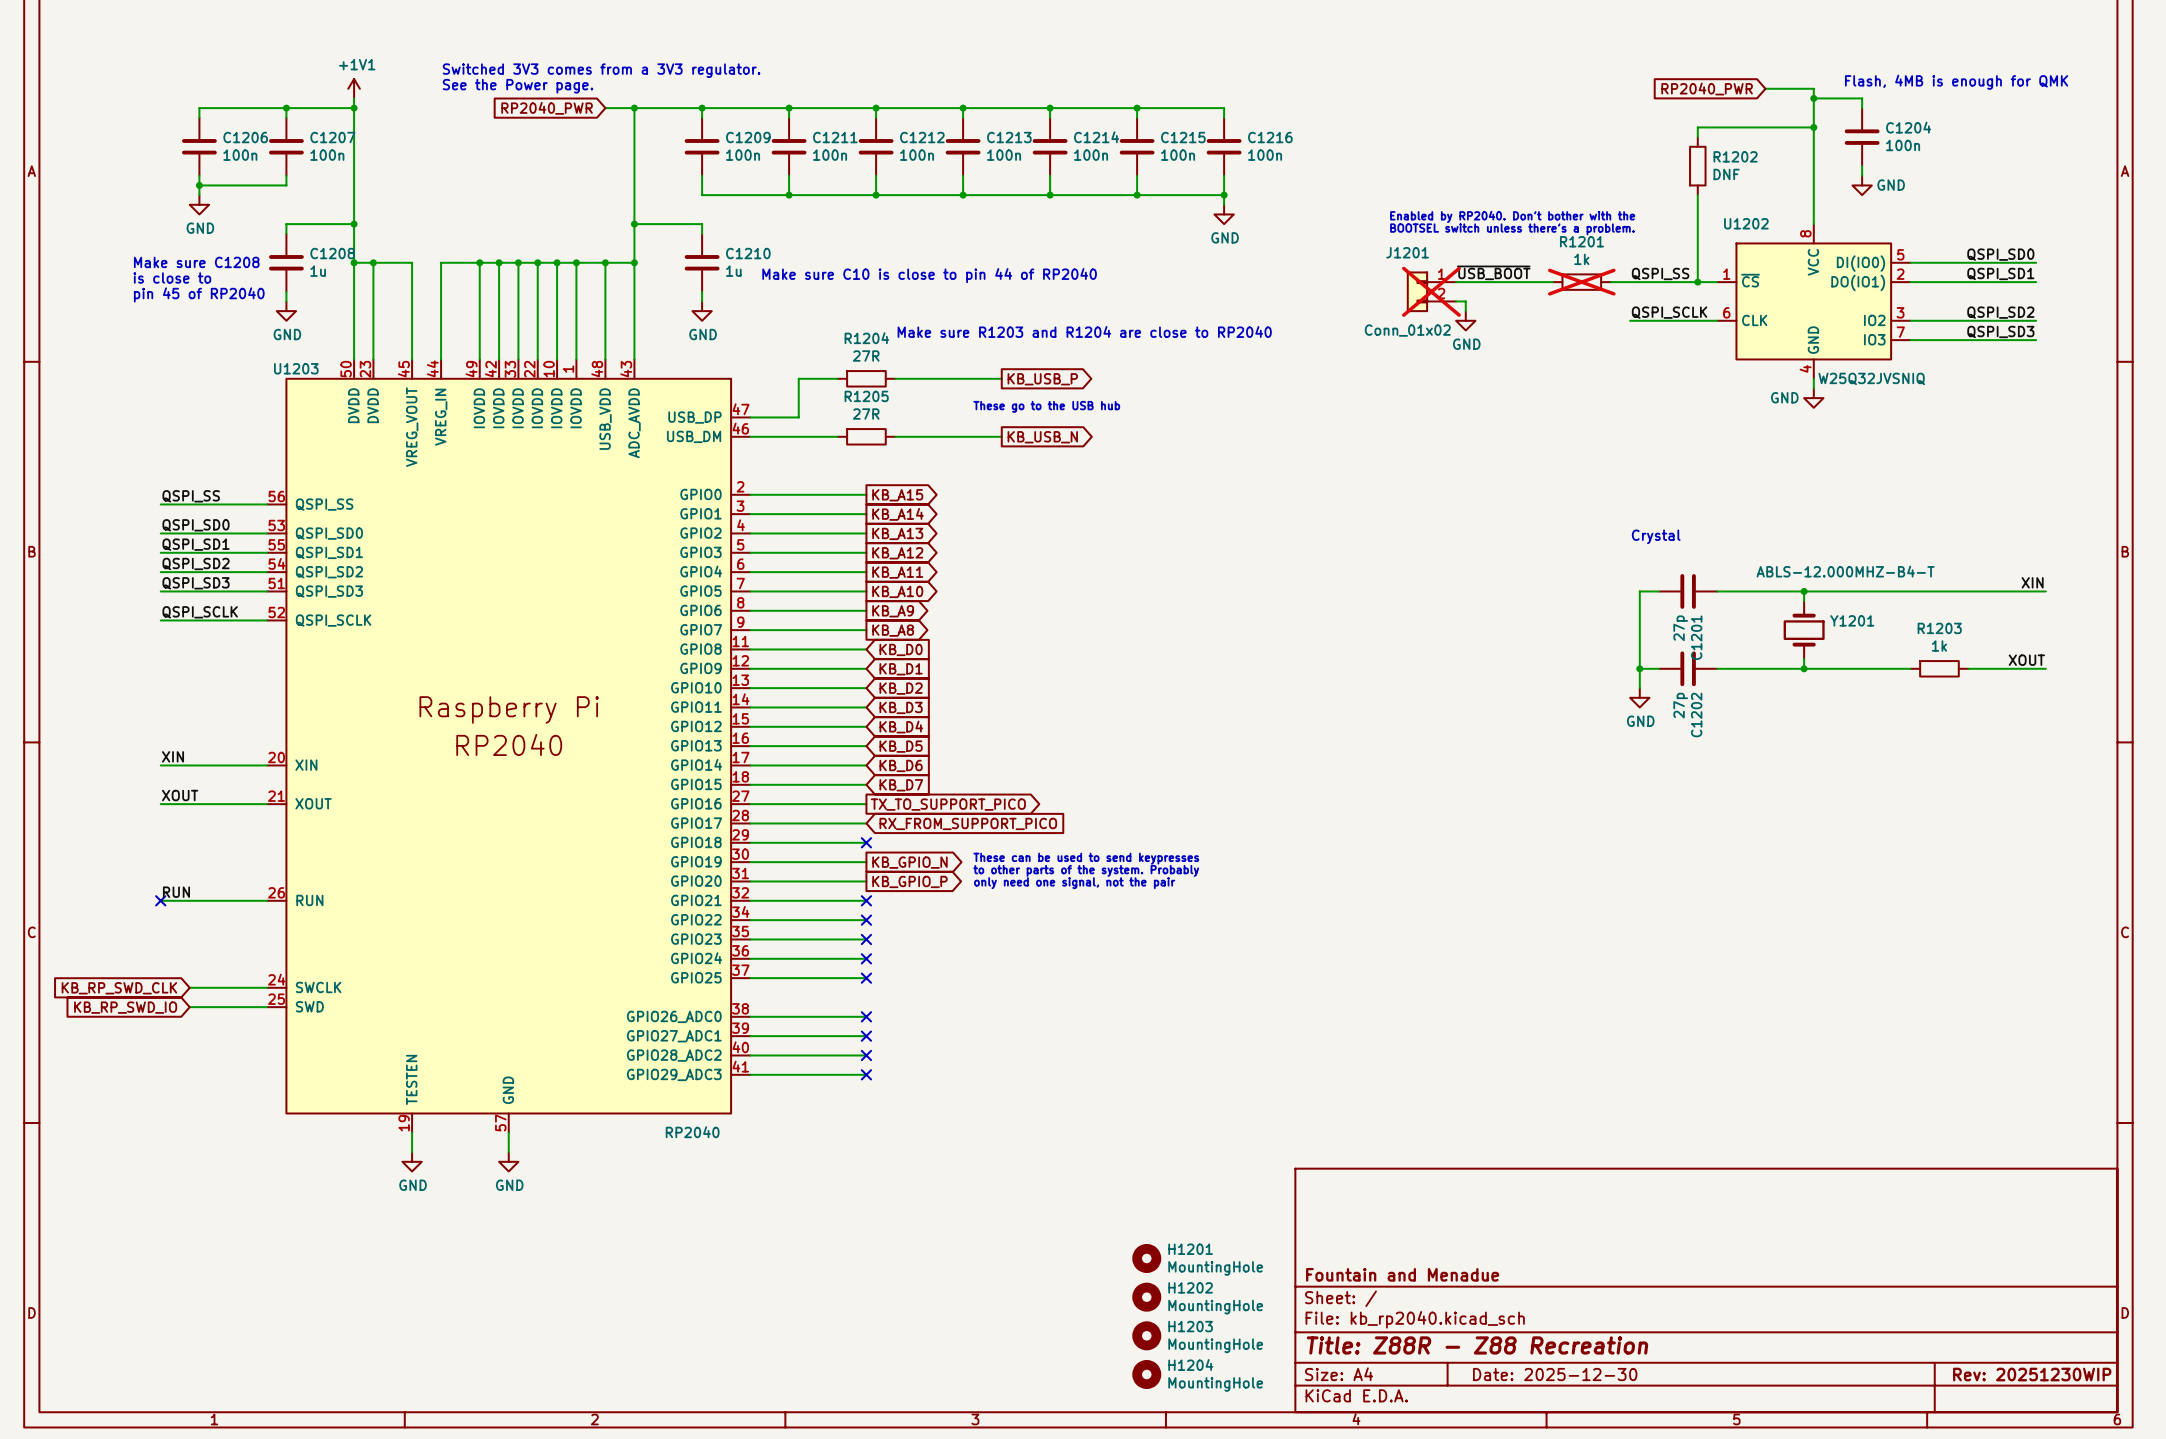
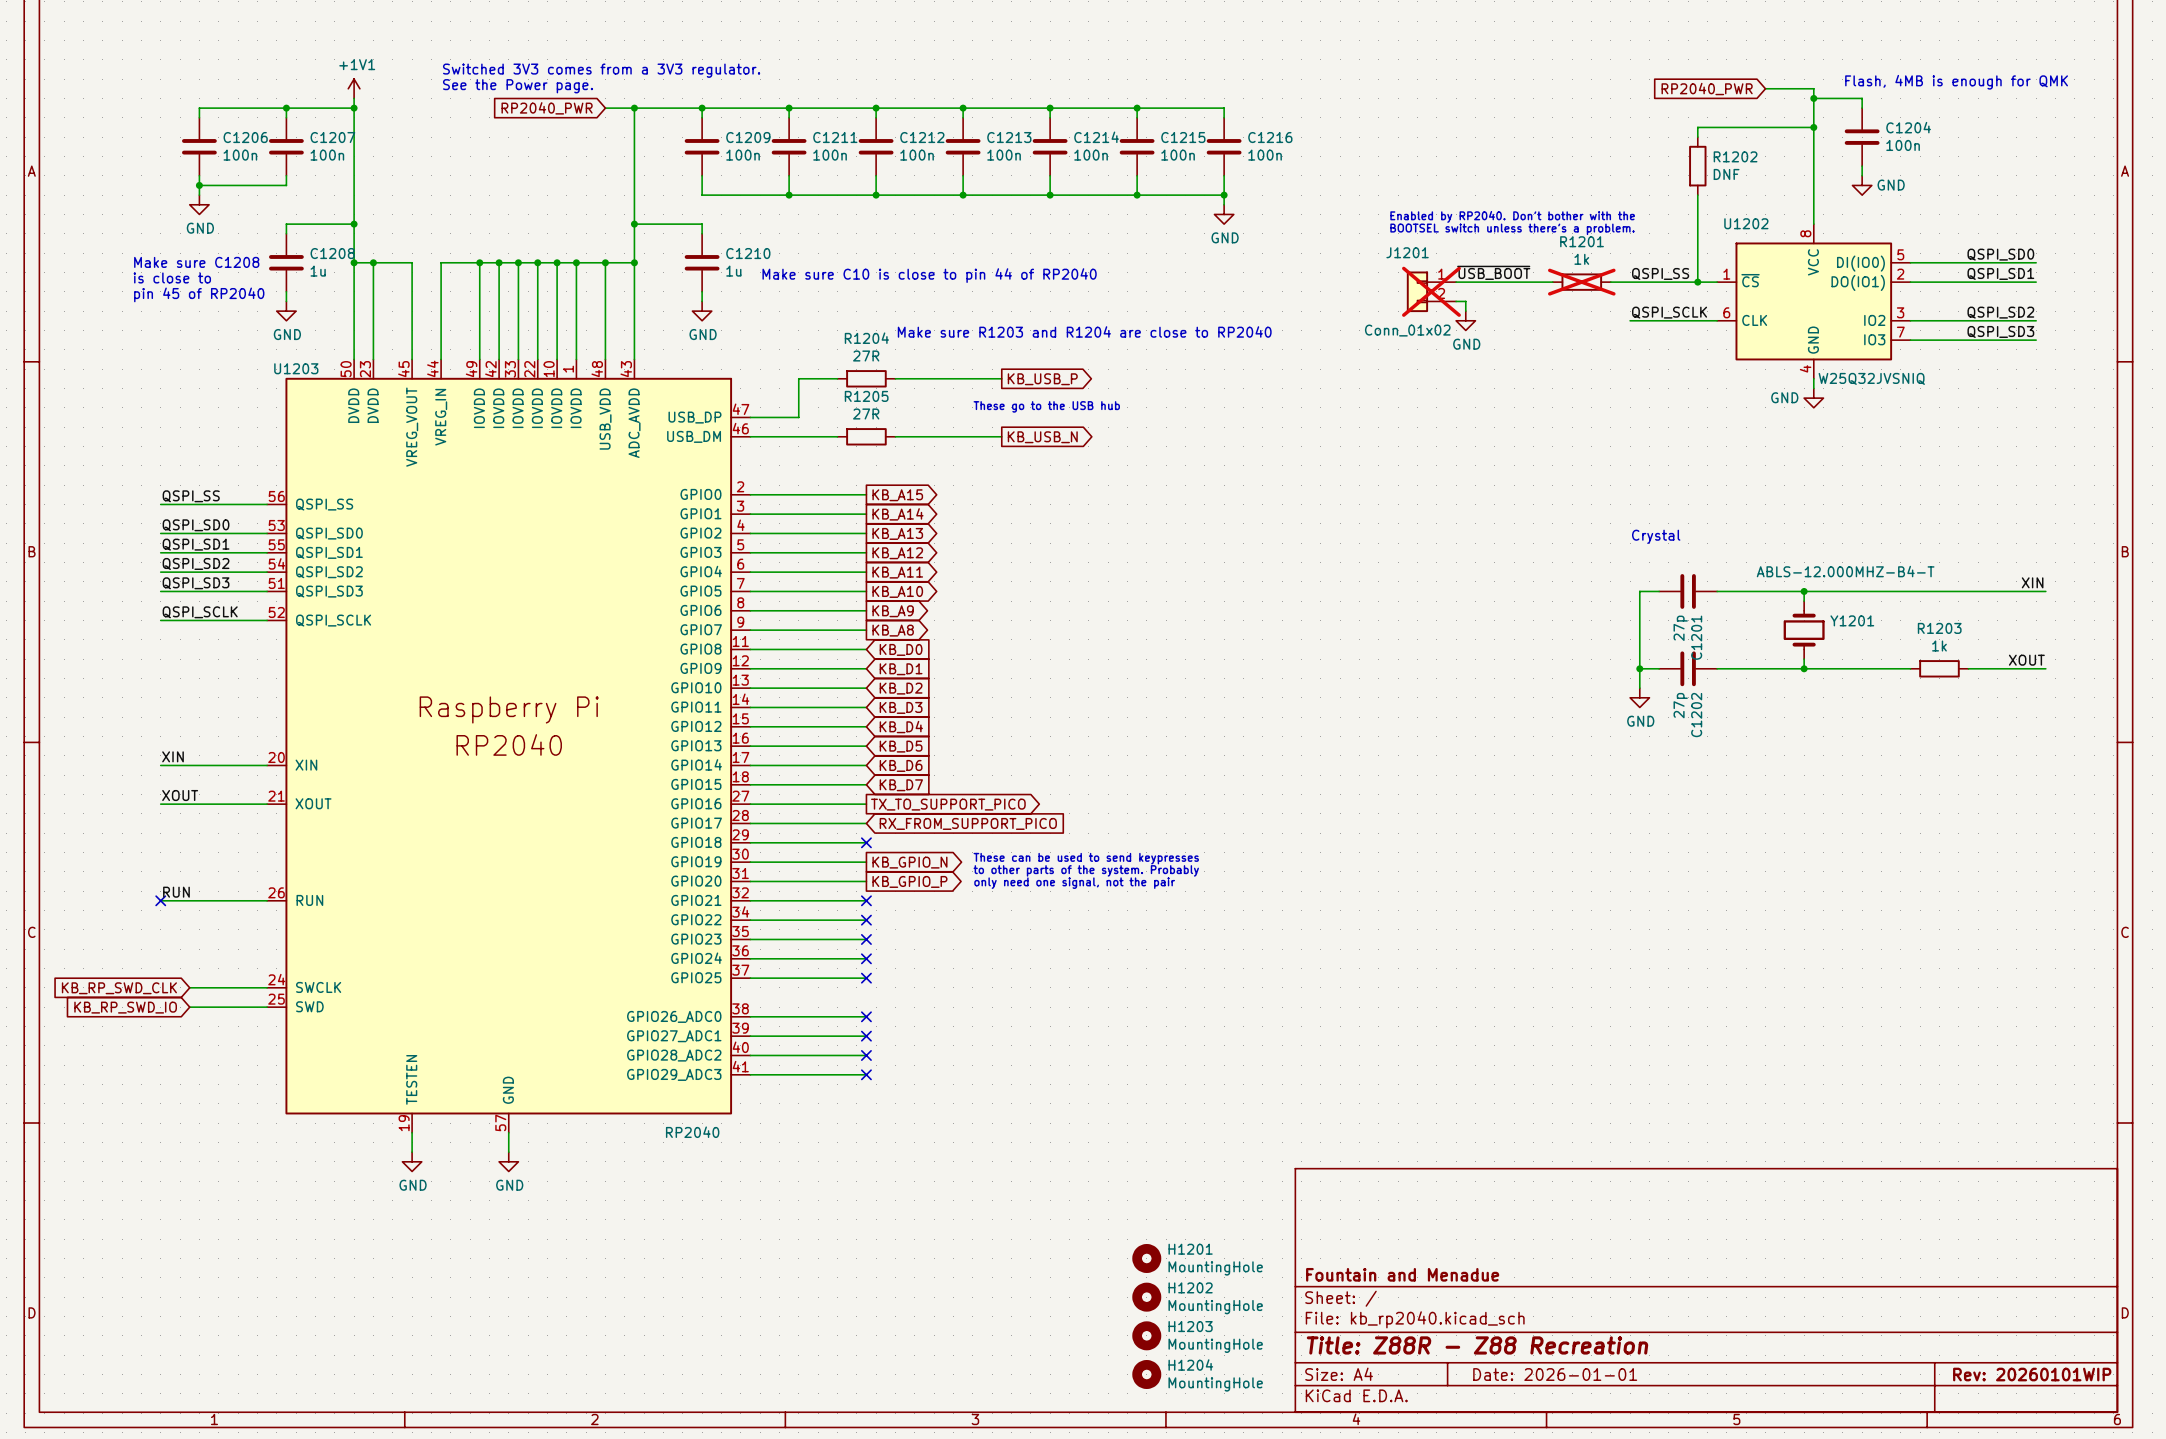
title block: Date: 2025-12-30 (1555, 1374) -> Date: 2026-01-01 (1555, 1374)
title block: Rev: 20251230WIP (2032, 1374) -> Rev: 20260101WIP (2032, 1374)

